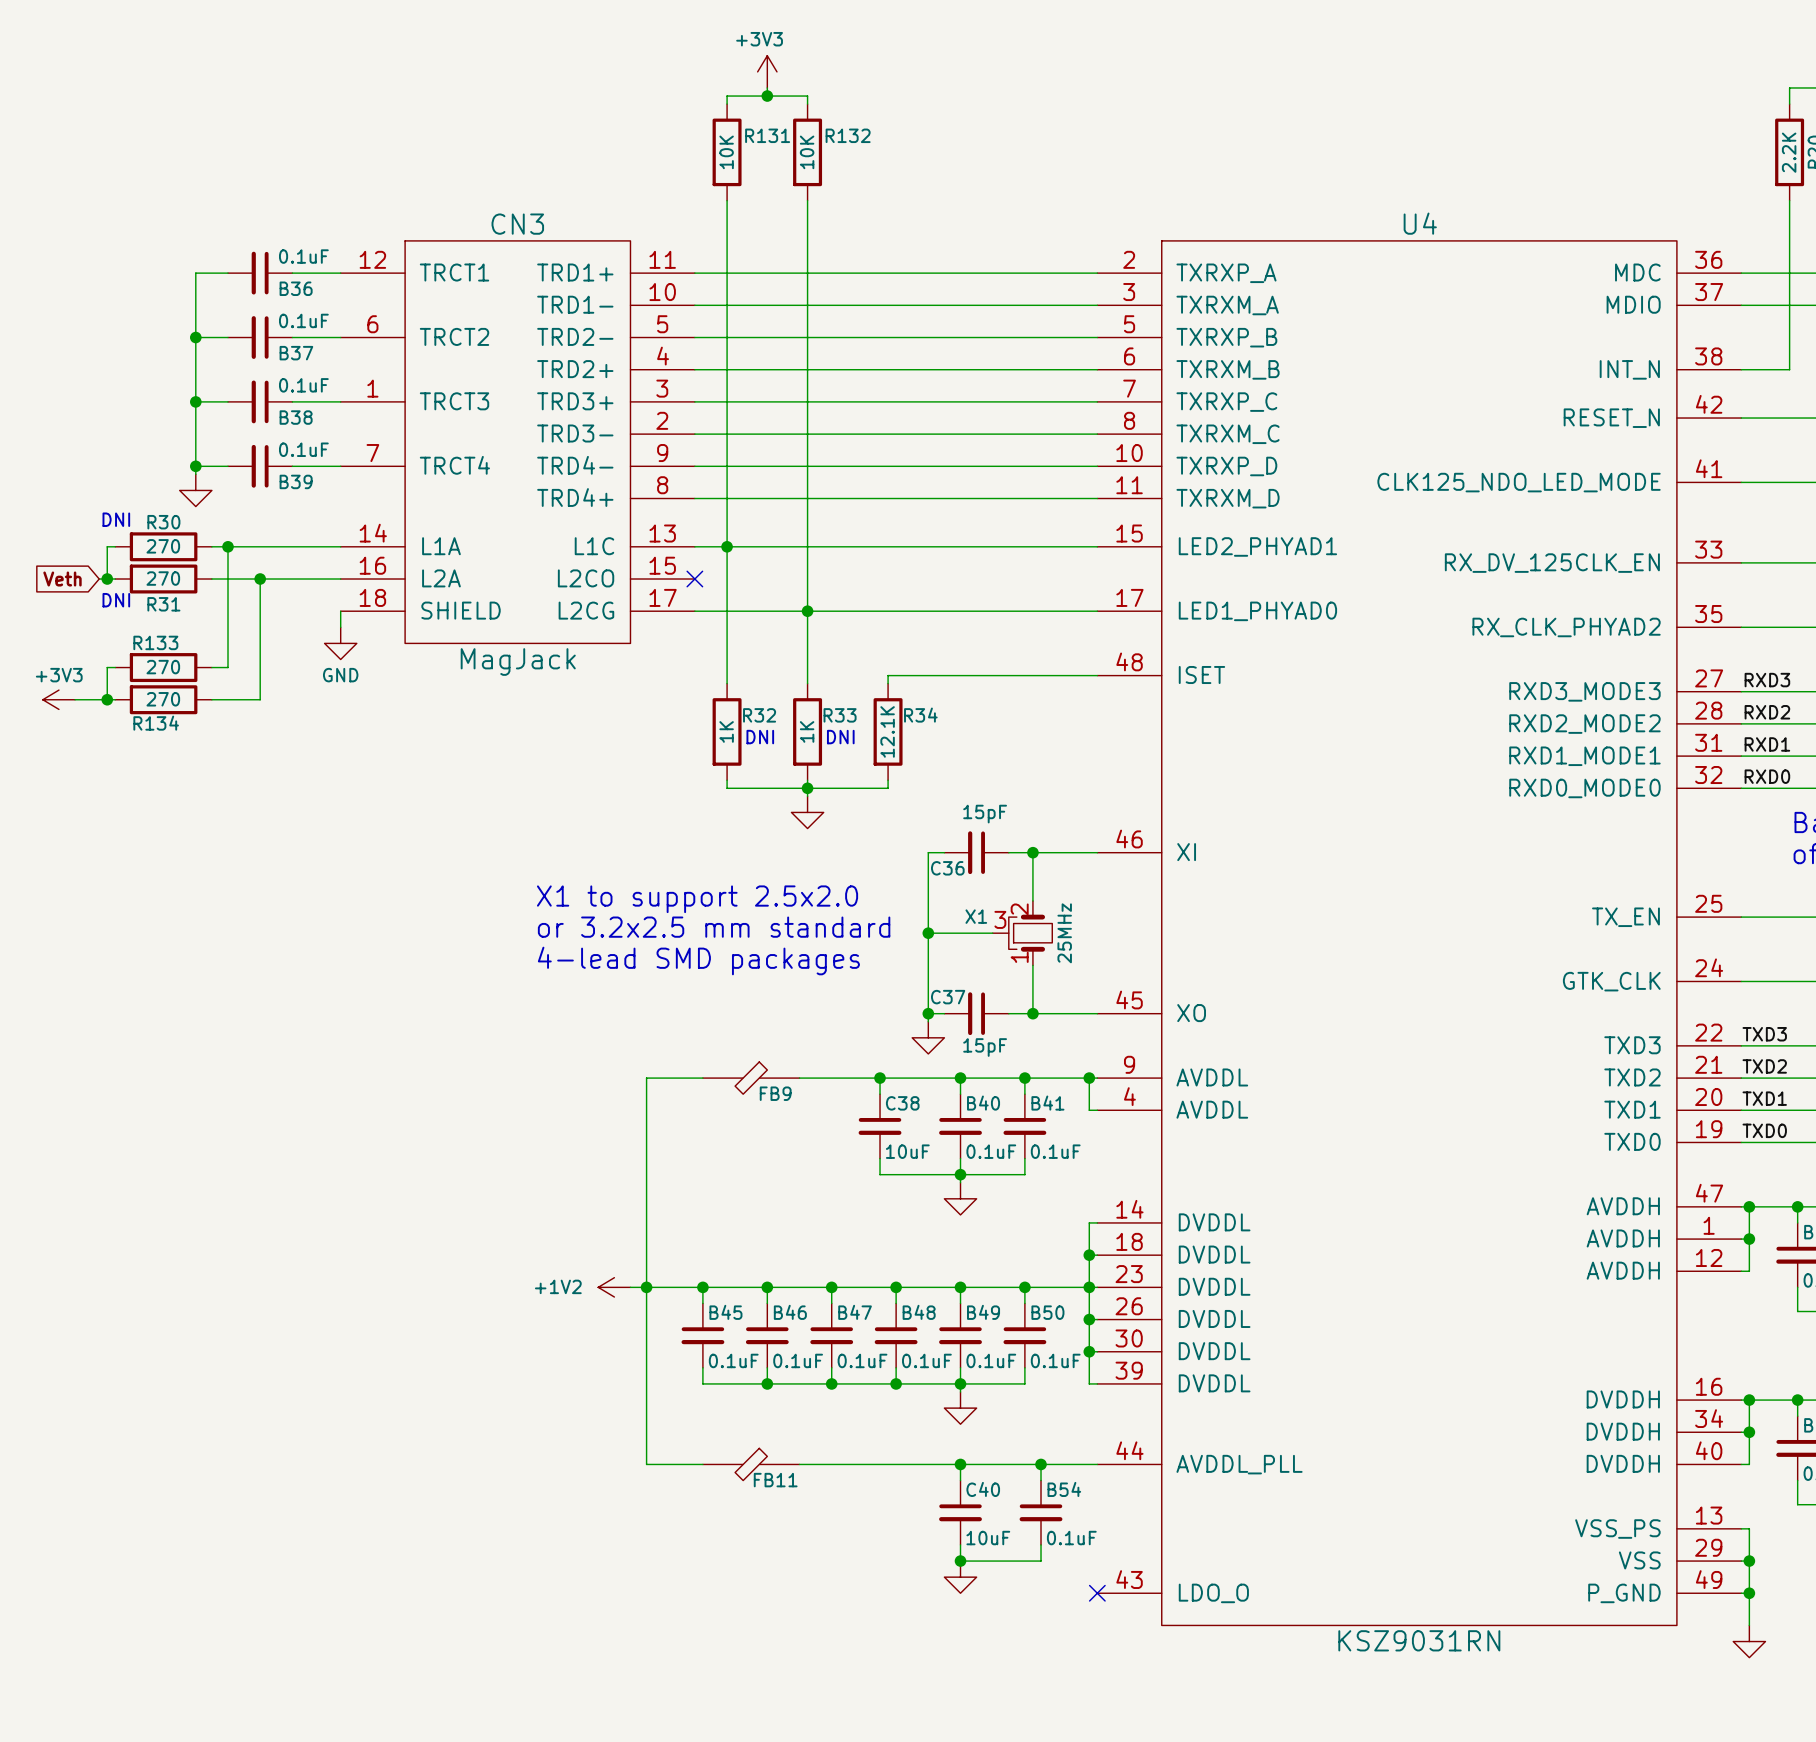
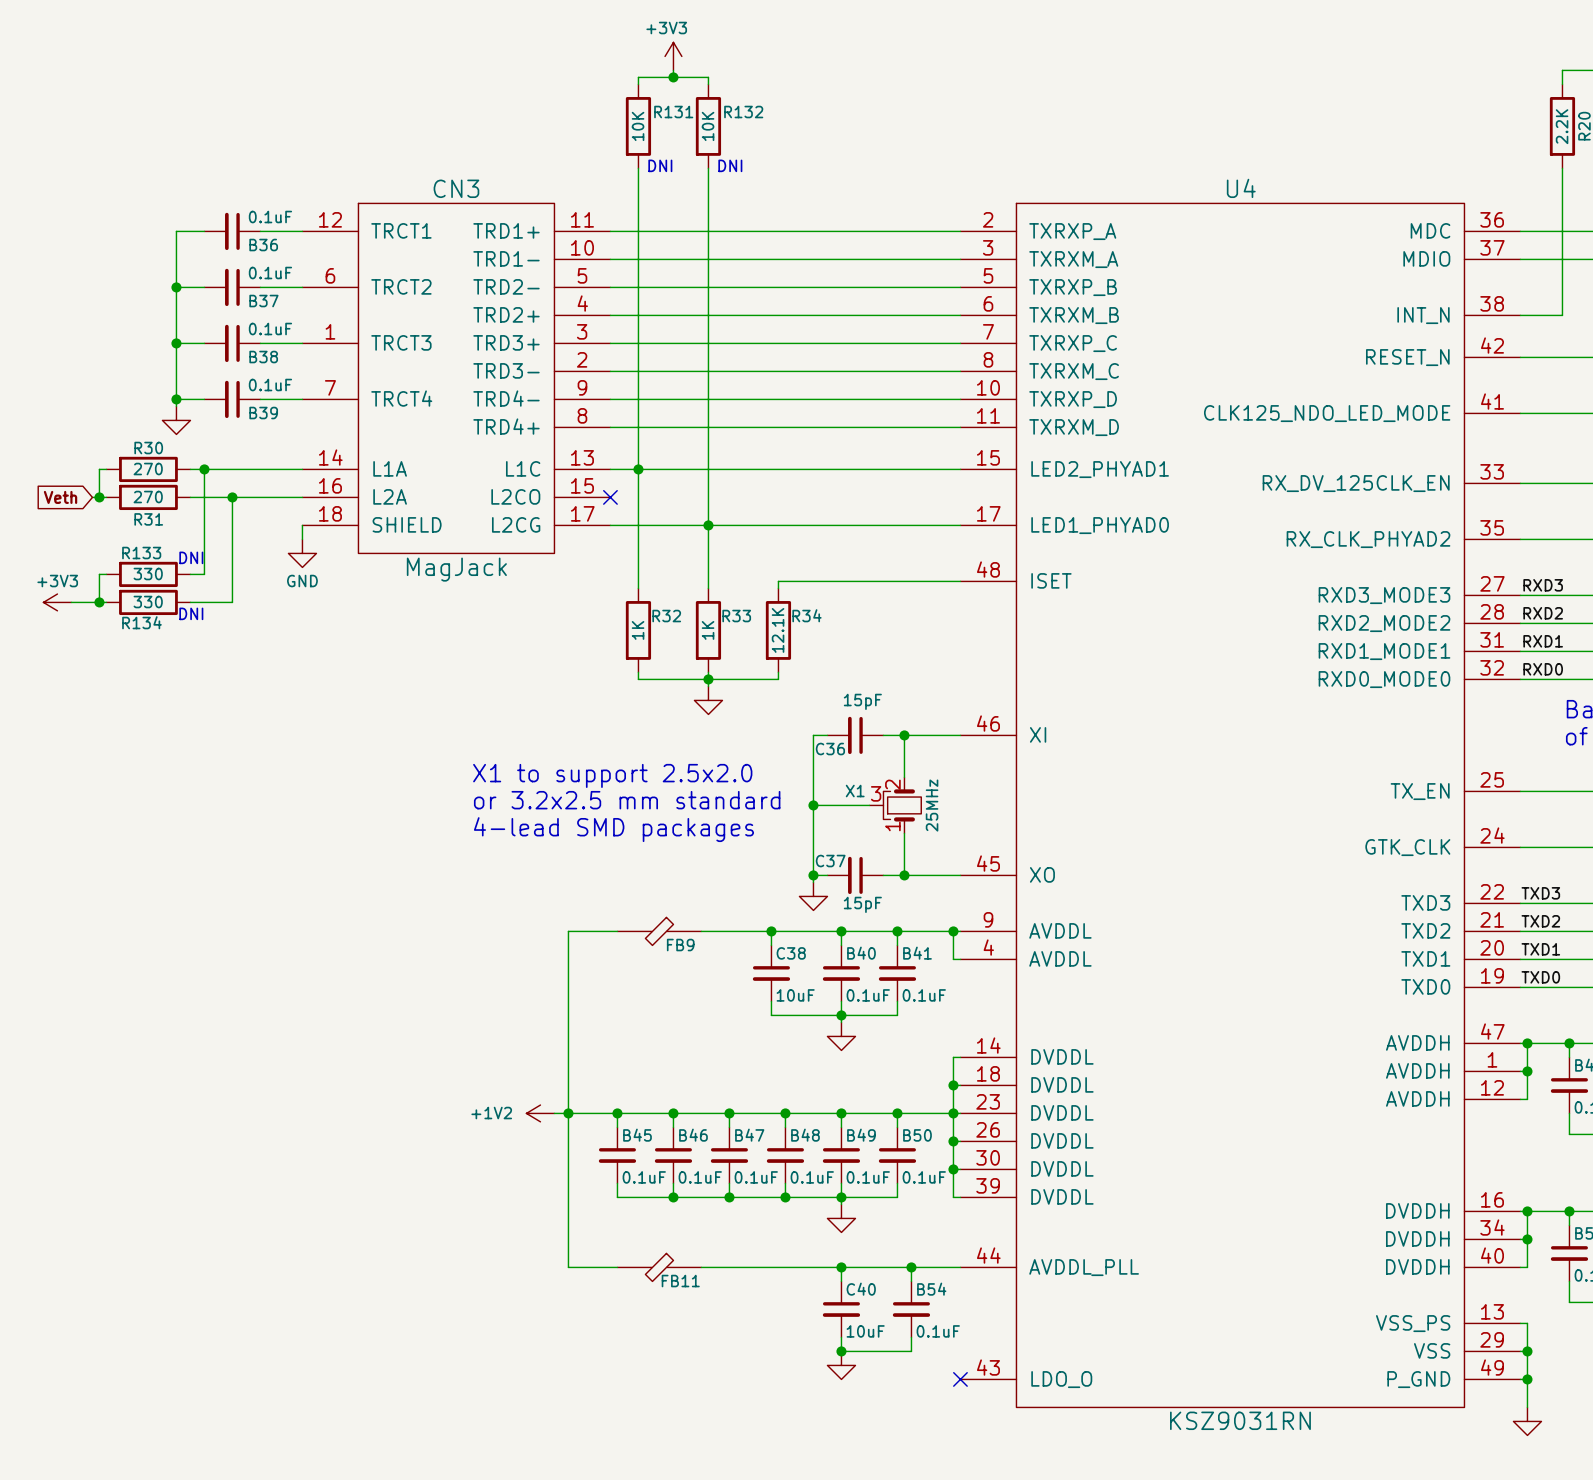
text: none -> DNI (660, 165)
text: none -> DNI (730, 165)
text: DNI (116, 519) -> none
text: DNI (116, 600) -> none
text: none -> DNI (191, 557)
R133 value: 270 (163, 667) -> 330 (148, 574)
R134 value: 270 (163, 699) -> 330 (148, 602)
text: none -> DNI (191, 613)
text: DNI (760, 737) -> none
text: DNI (840, 737) -> none

